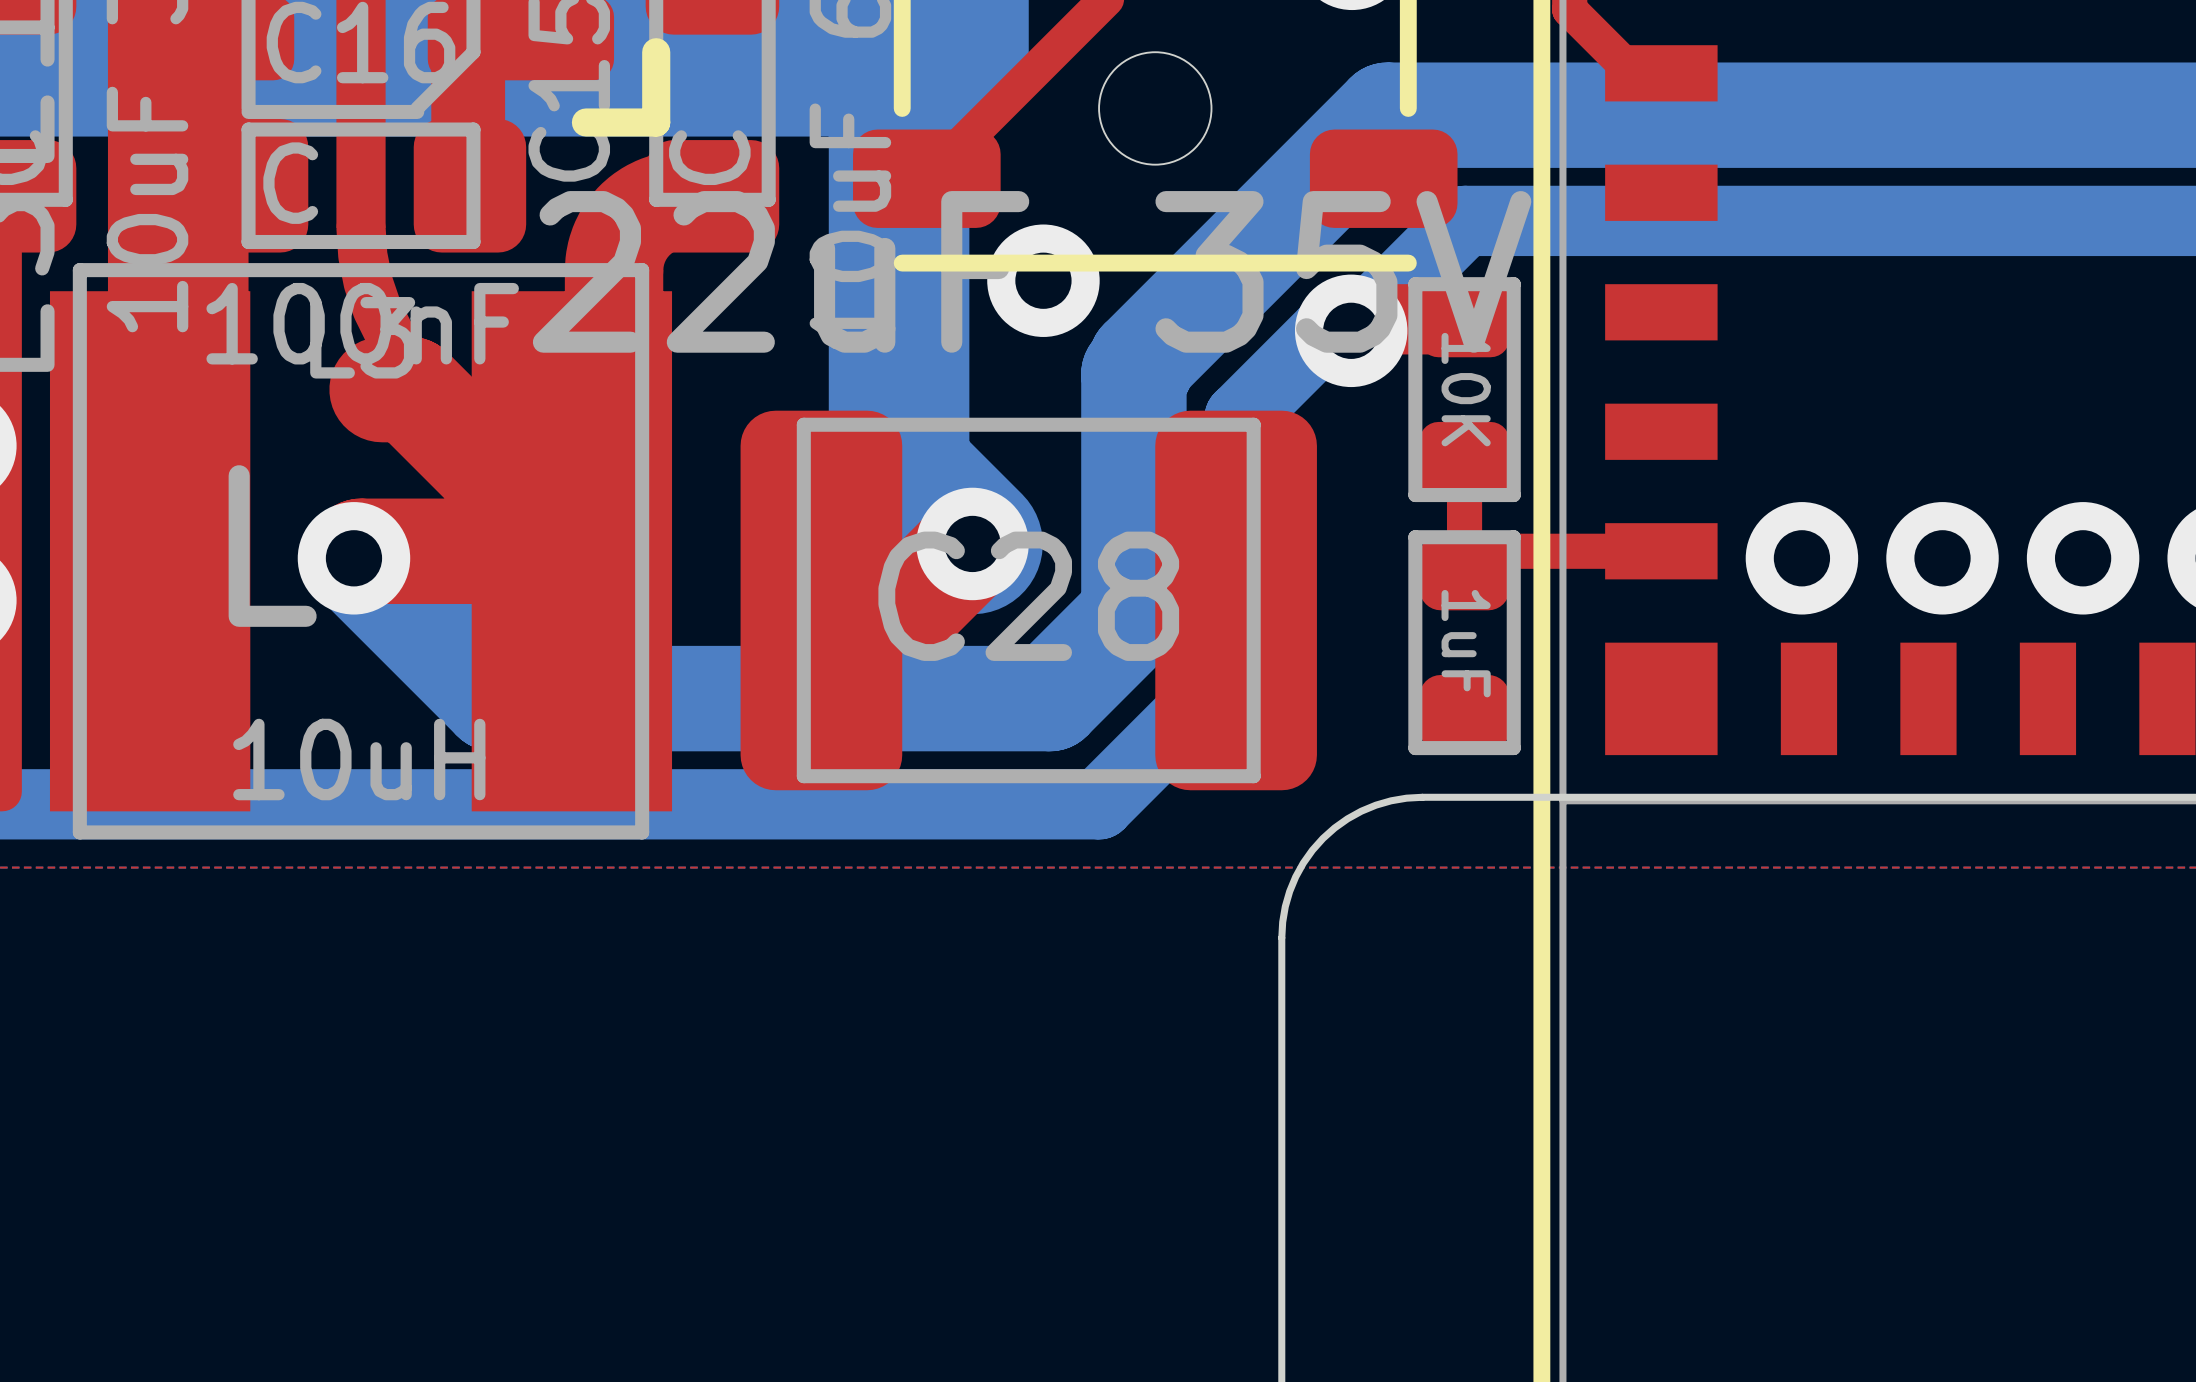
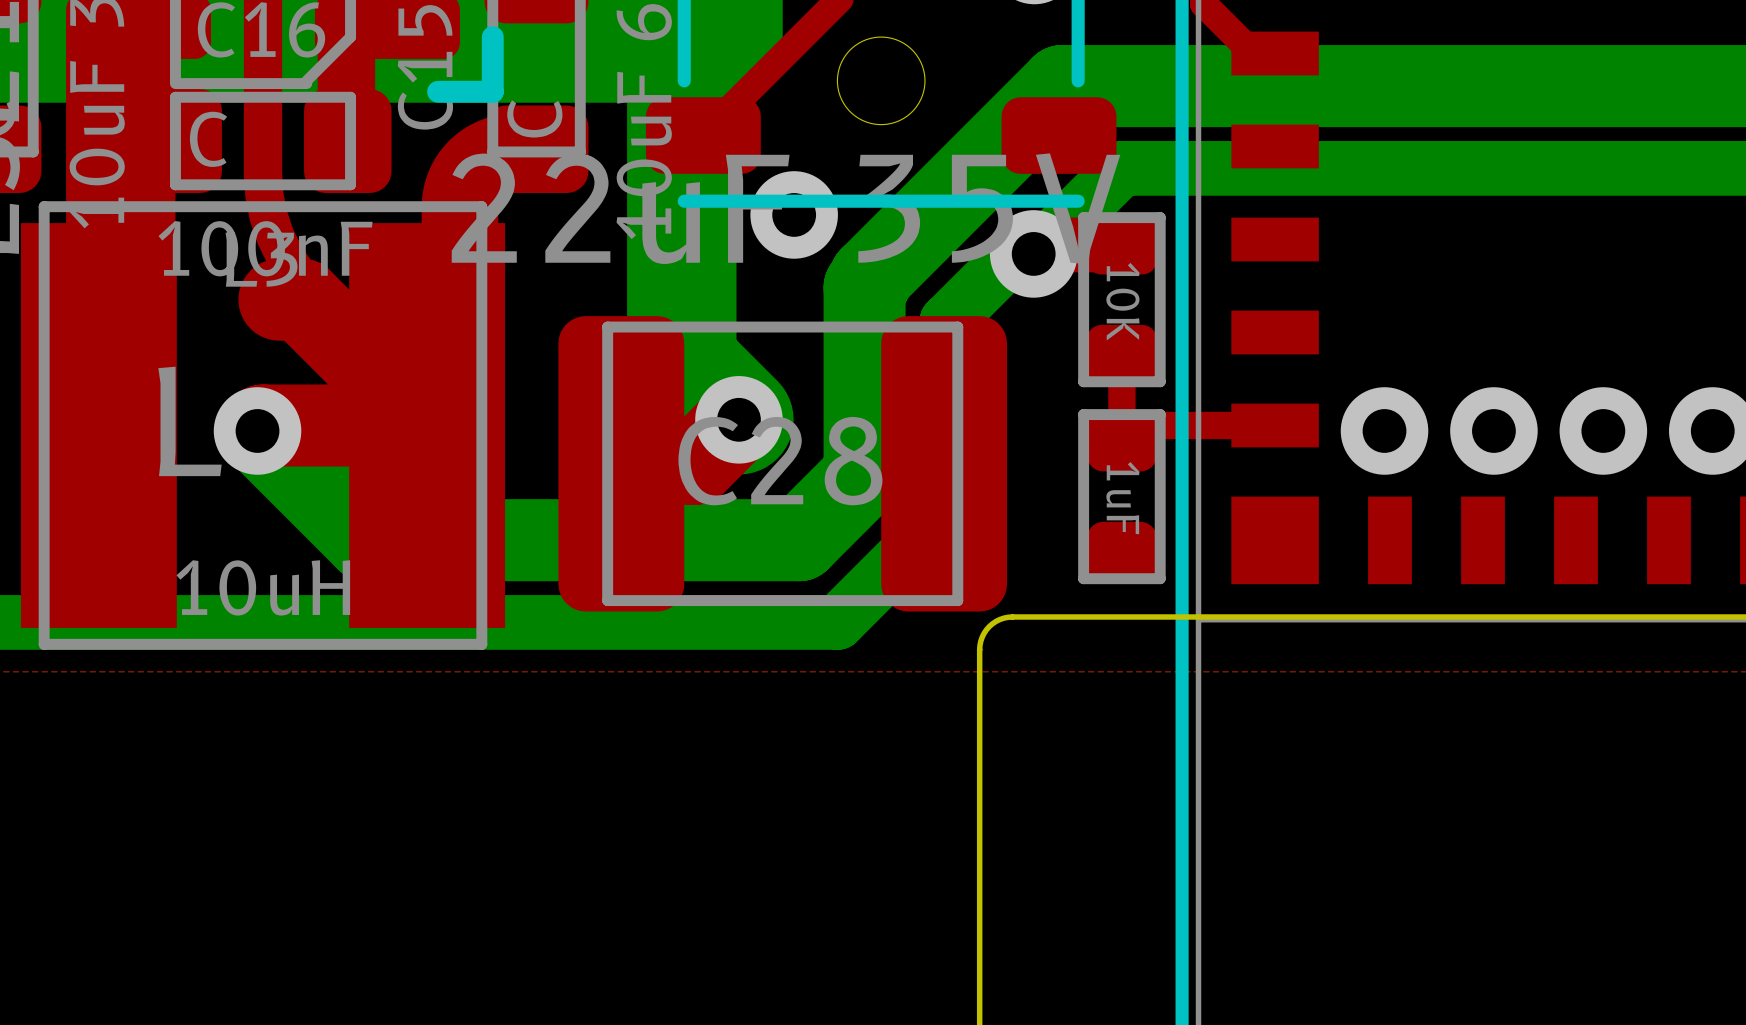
board edge: (1422, 797) (1391, 800) (1361, 811) (1347, 818) (1322, 838) (1303, 863) (1295, 876) (1285, 906) (1281, 937) -> (1089, 616) (1008, 617) (999, 619) (989, 626) (982, 637) (979, 645) (979, 726)

